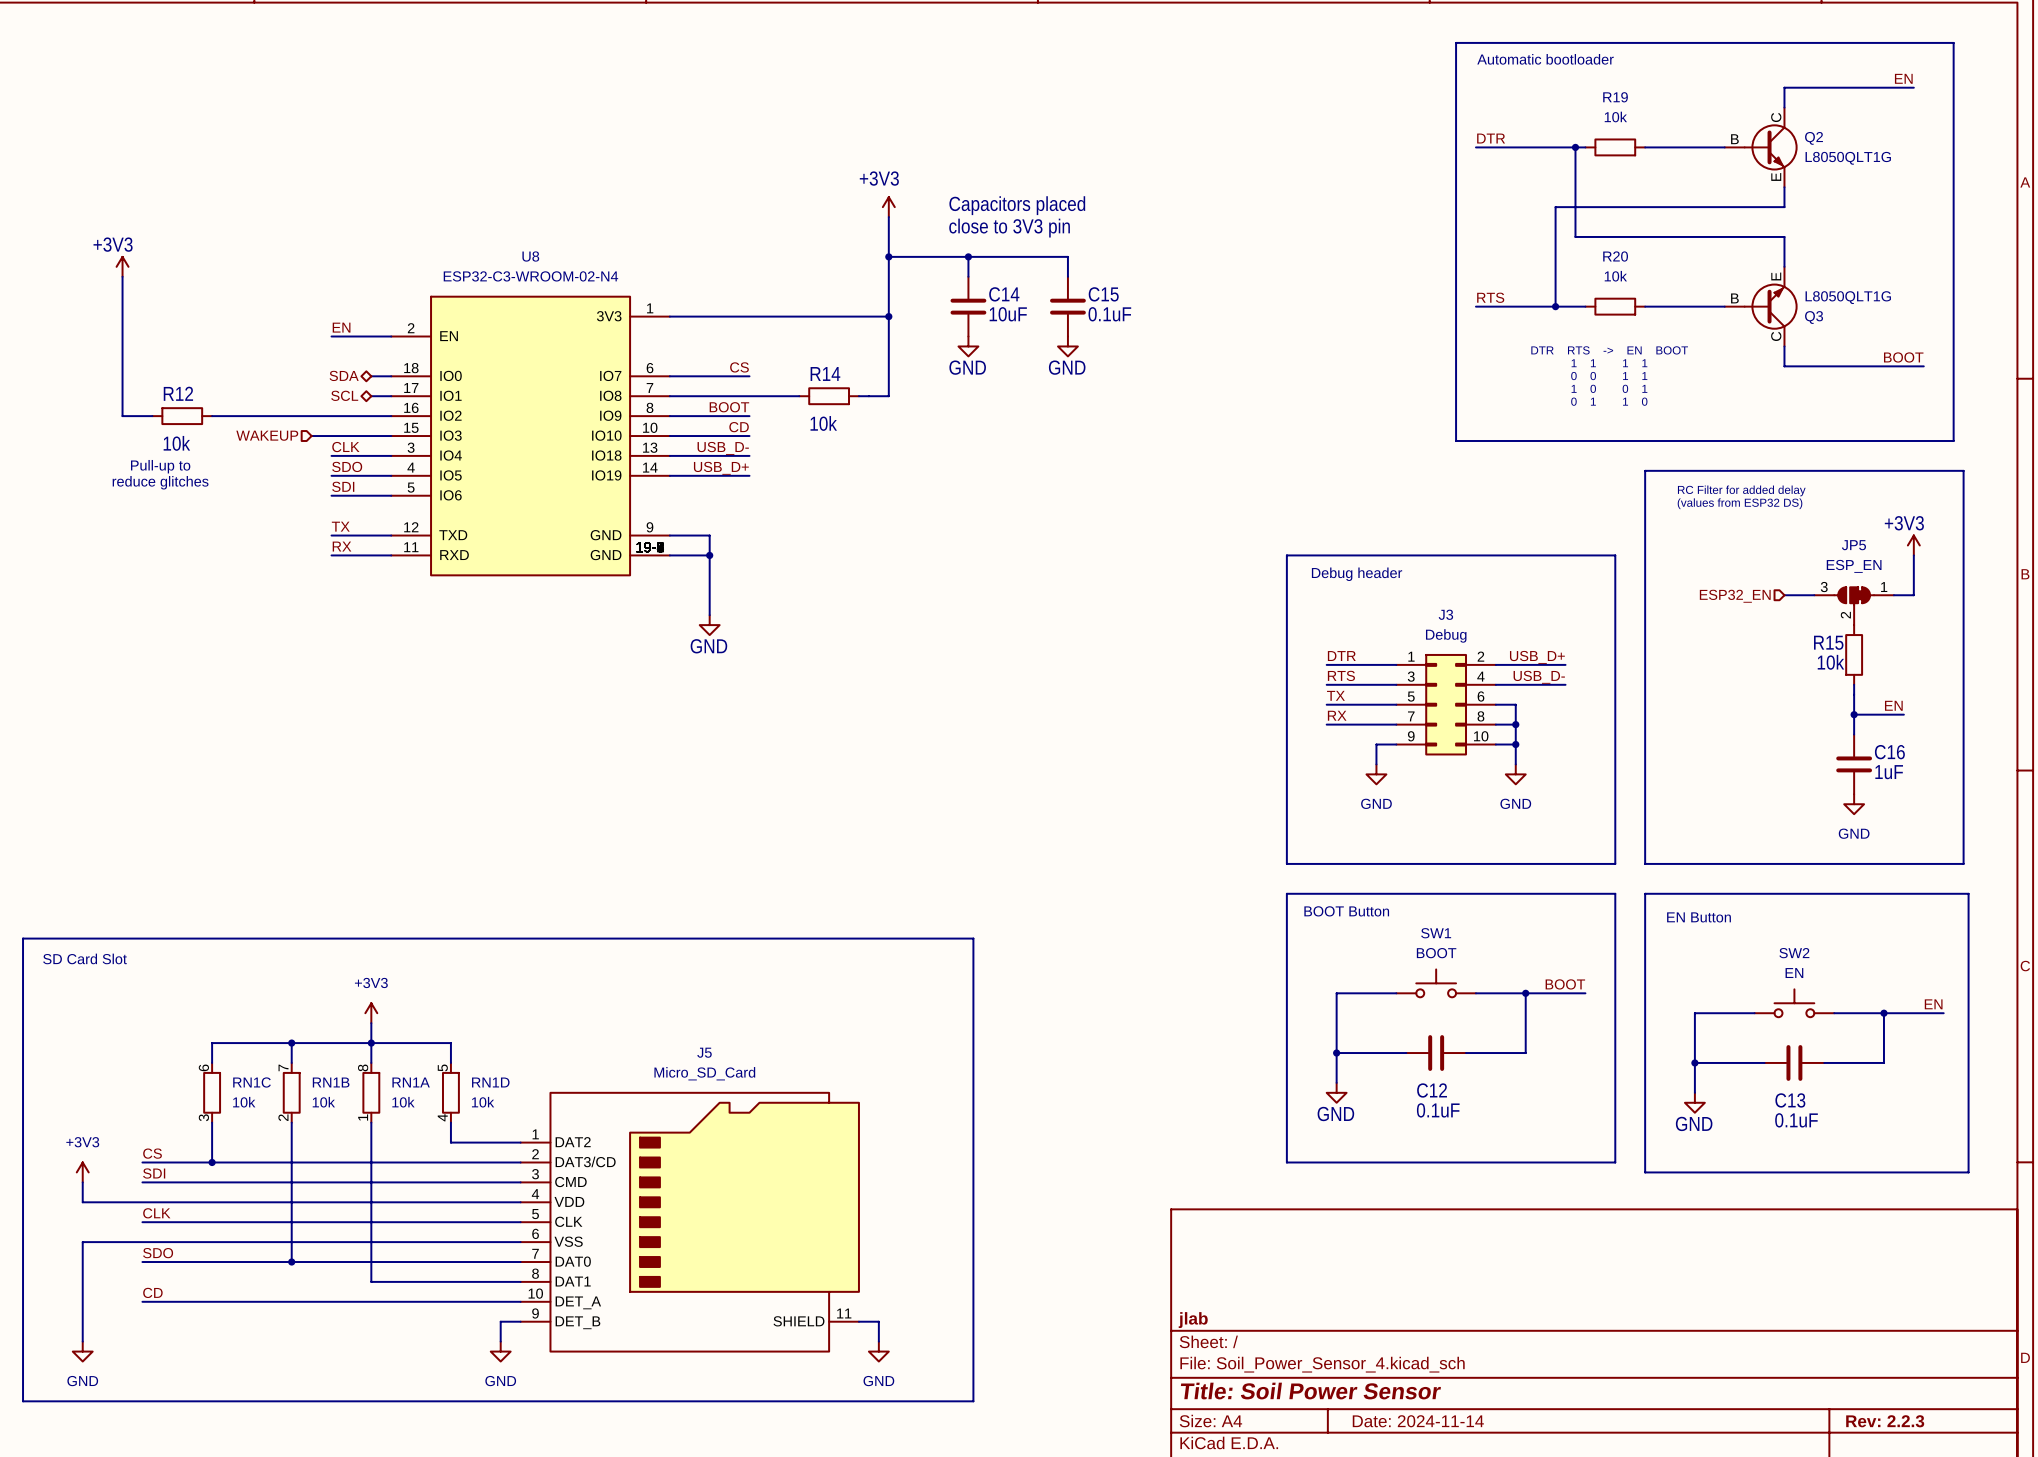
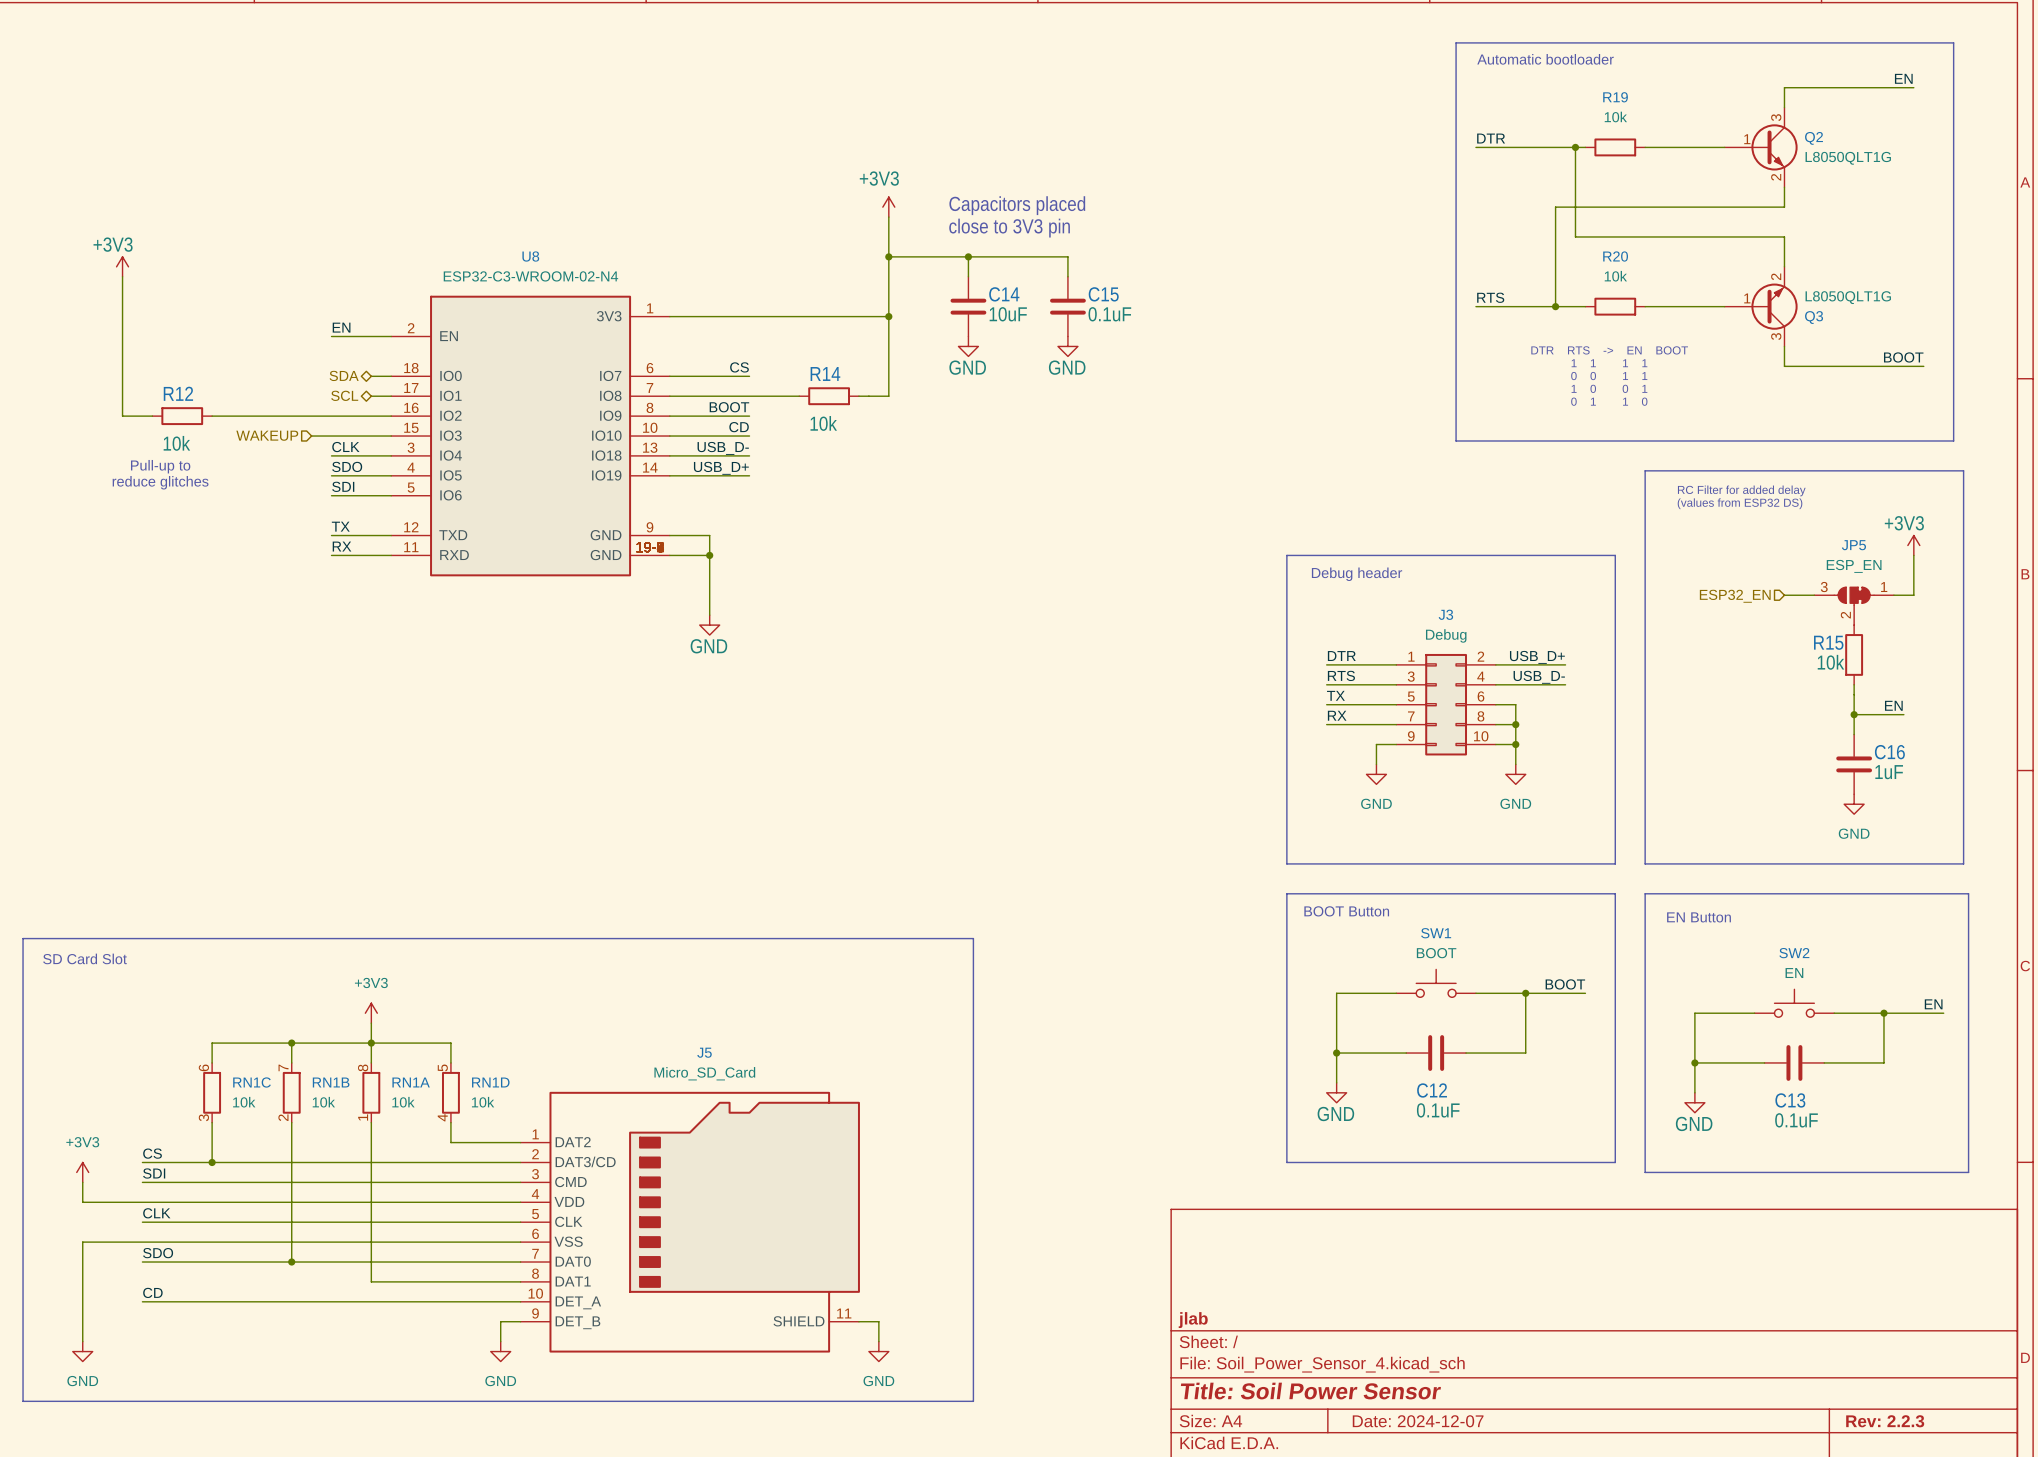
Q2 symbol: [1724, 107, 1798, 188] -> [1724, 107, 1798, 188]
Q3 symbol: [1724, 266, 1798, 347] -> [1724, 266, 1798, 347]
title block: Date: 2024-11-14 (1418, 1421) -> Date: 2024-12-07 (1418, 1421)

